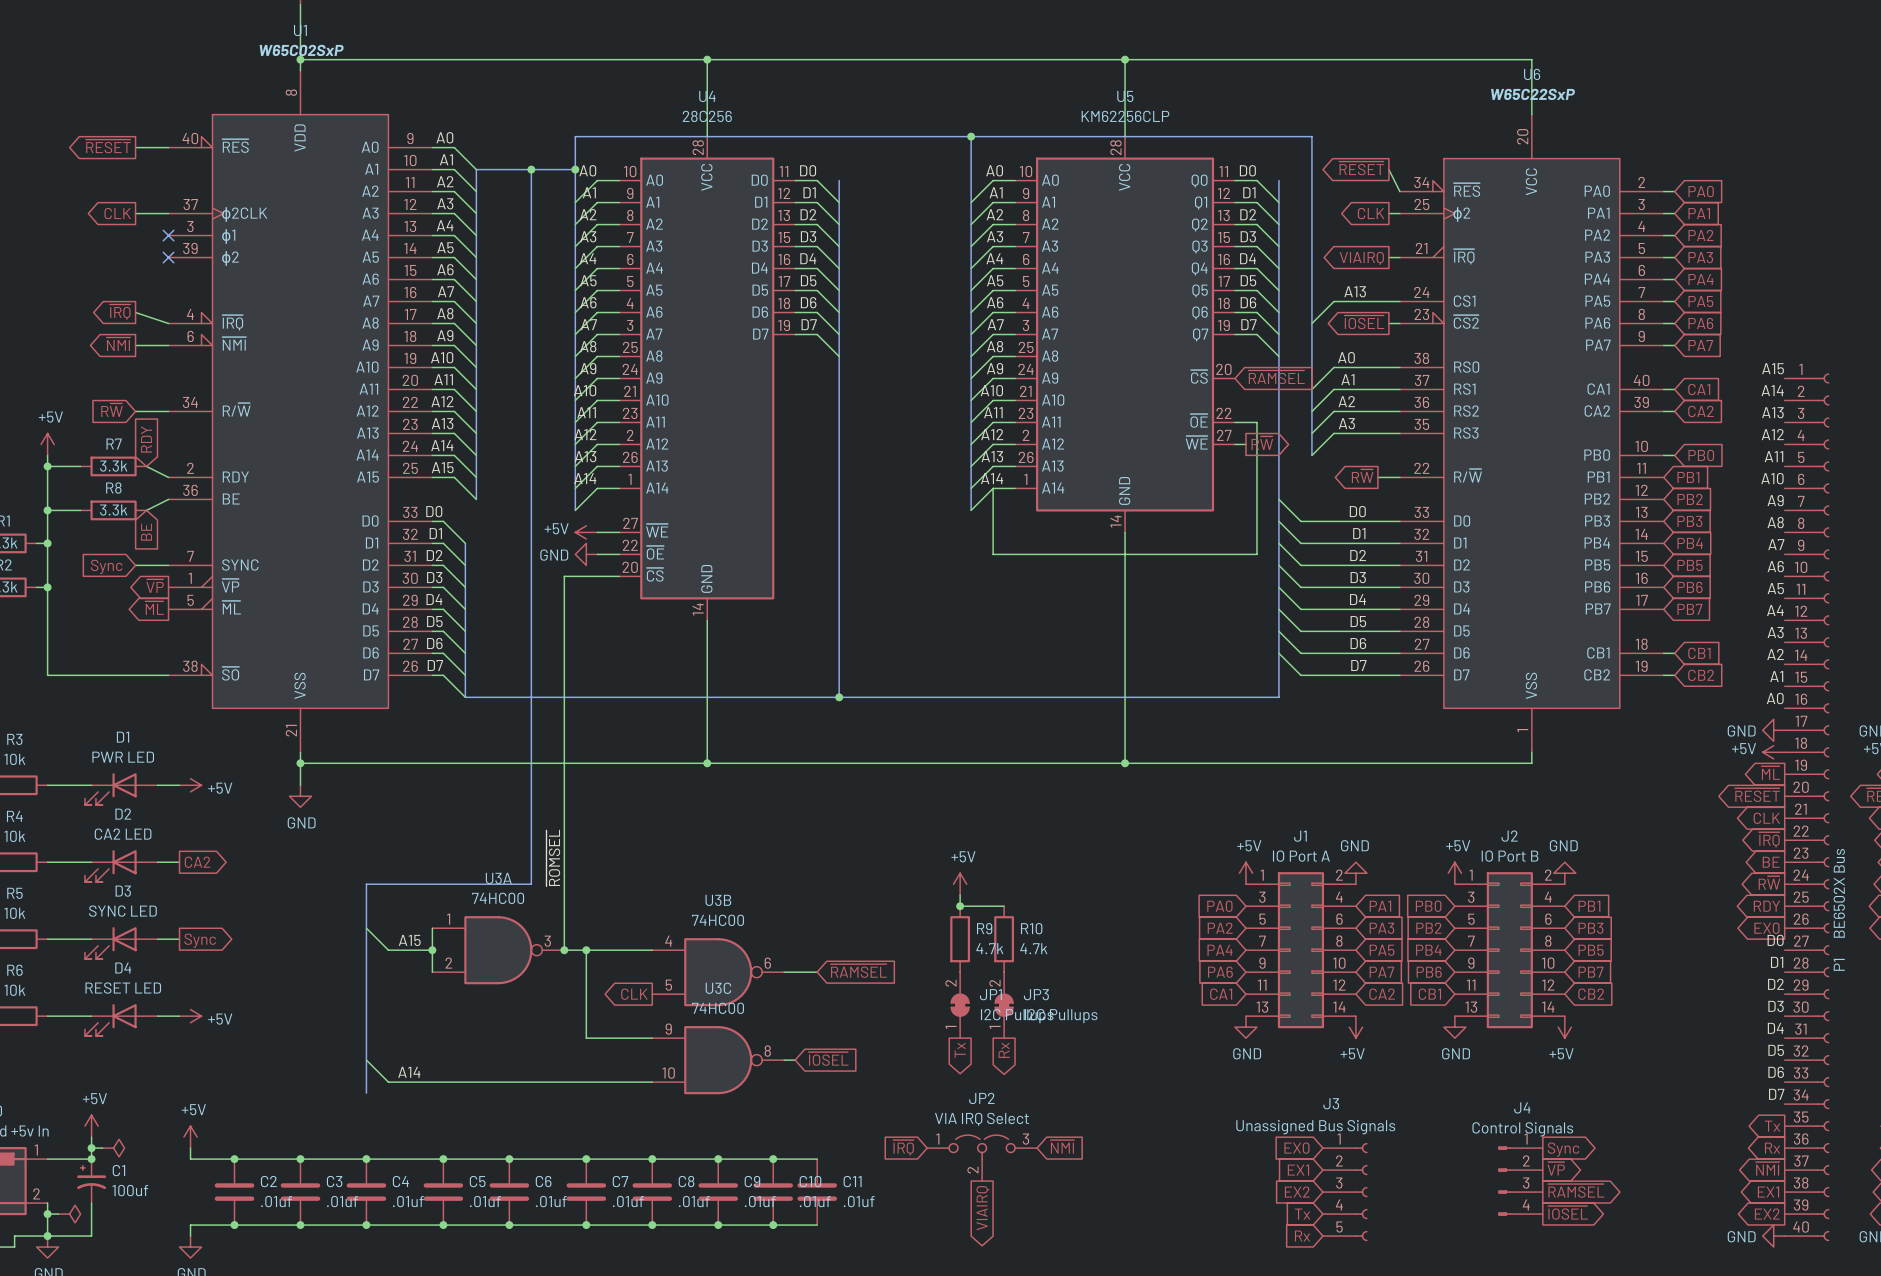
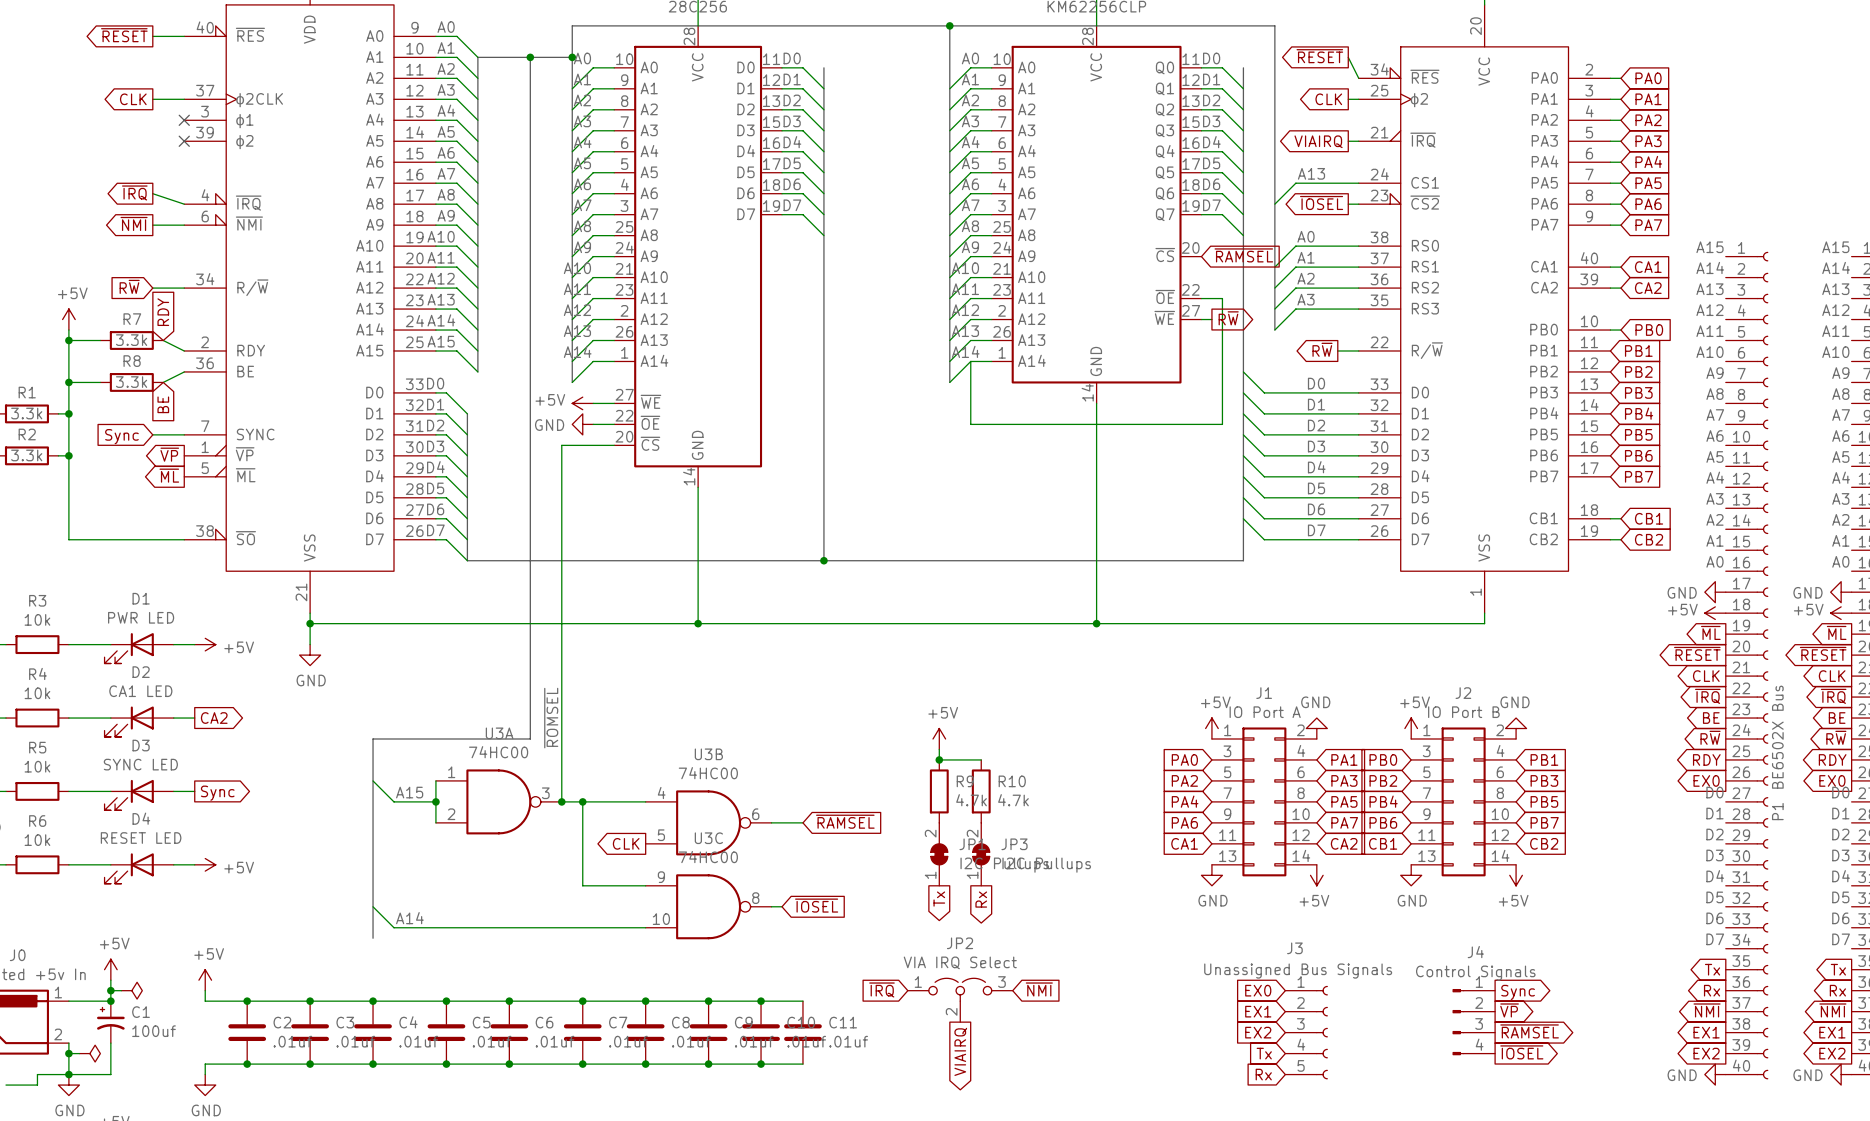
D2 value: CA2 LED (123, 834) -> CA1 LED (140, 691)

